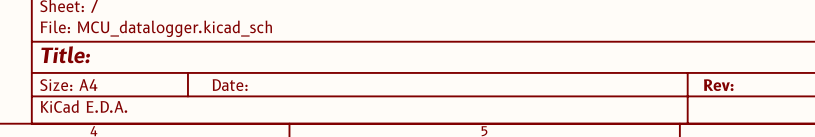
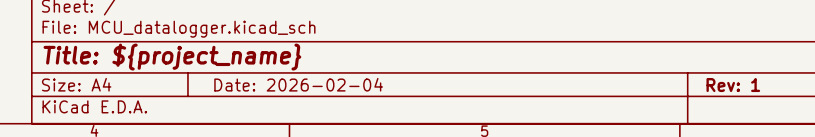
title block: Title: (65, 54) -> Title: ${project_name} (172, 57)
title block: Date: (230, 85) -> Date: 2026-02-04 (298, 84)
title block: Rev: (718, 85) -> Rev: 1 (733, 85)

